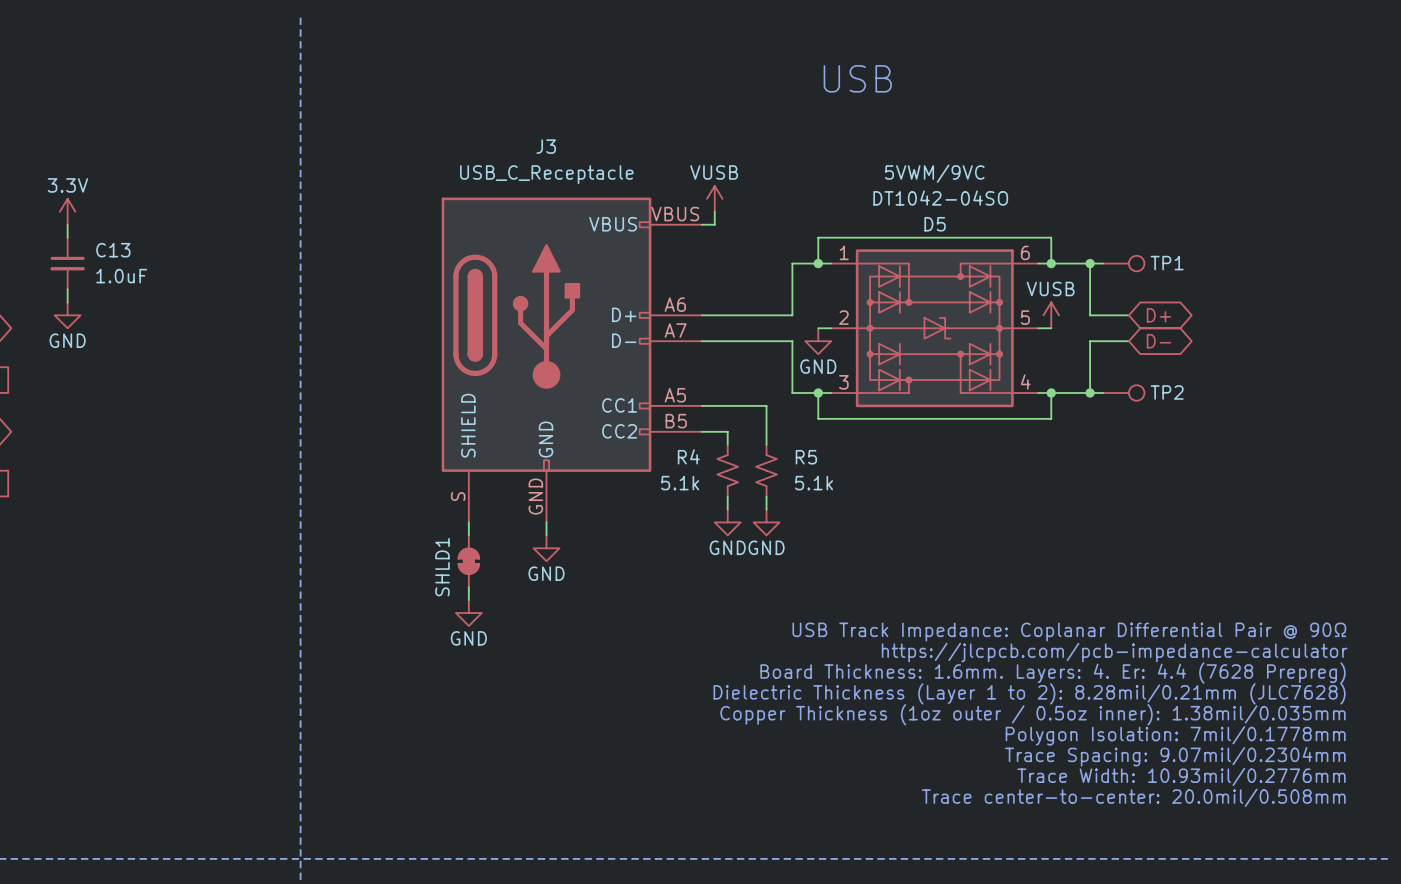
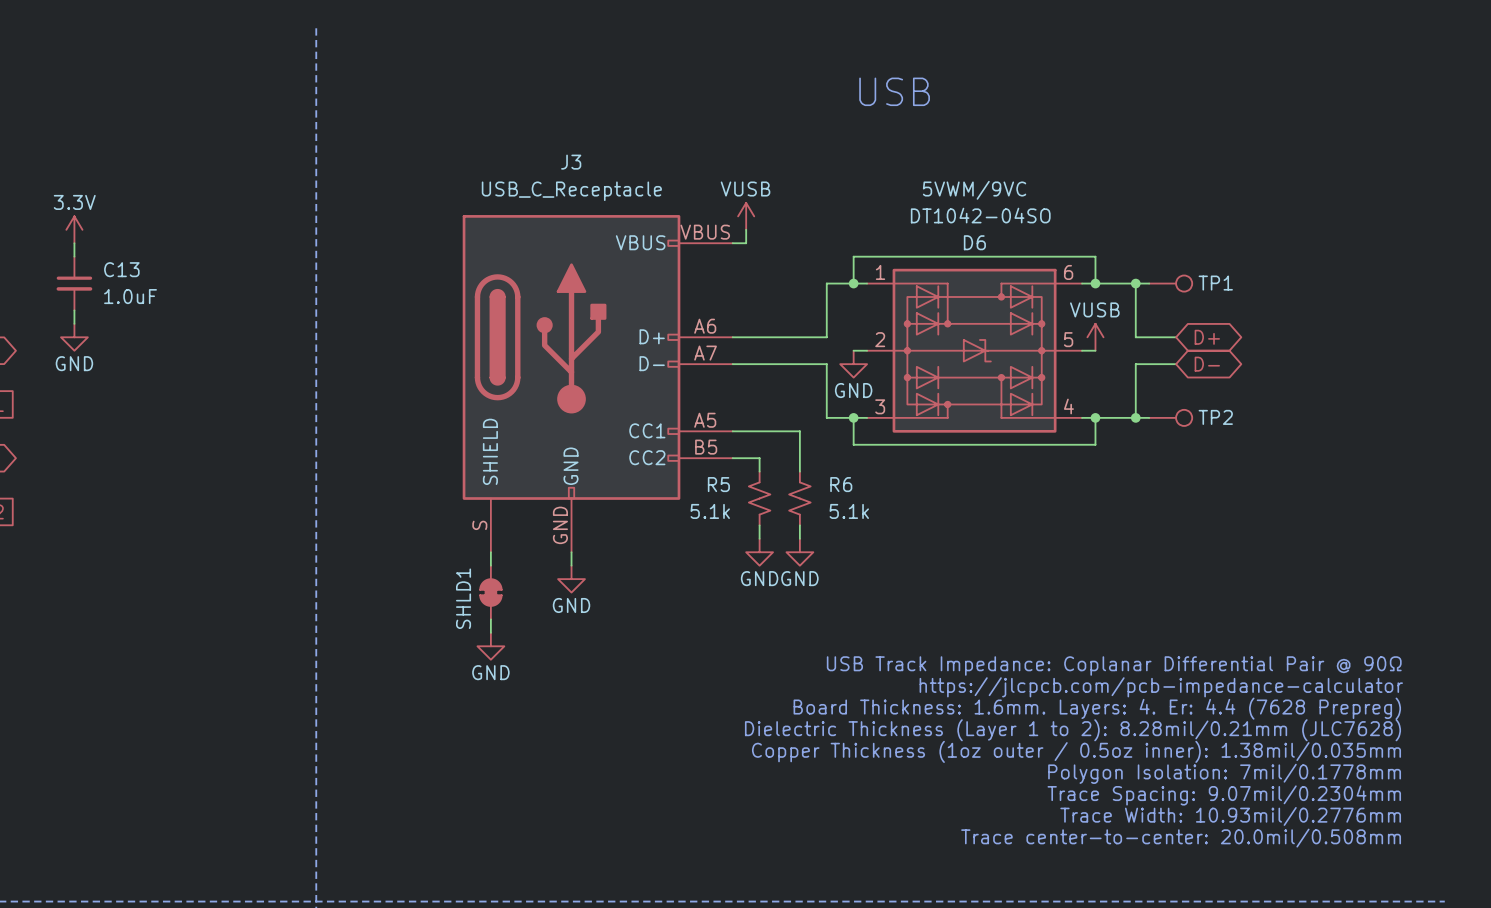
D5 name: D5 (935, 224) -> D6 (974, 242)
R4 name: R4 (688, 456) -> R5 (718, 484)
R5 name: R5 (806, 457) -> R6 (841, 484)

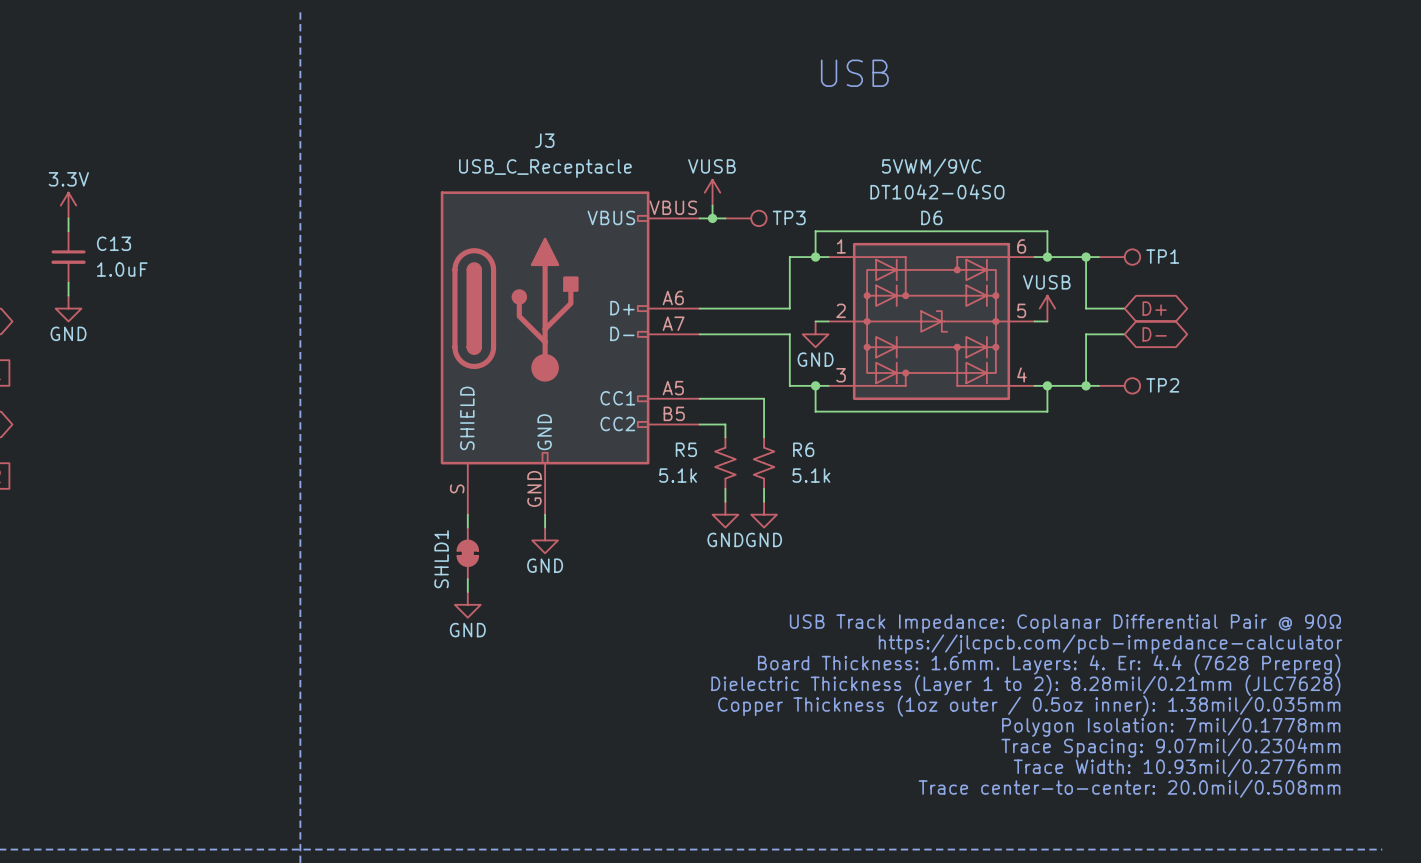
wire: none -> (712, 218) (725, 218)
junction: none -> (712, 218)
TP3: none -> (746, 218)

